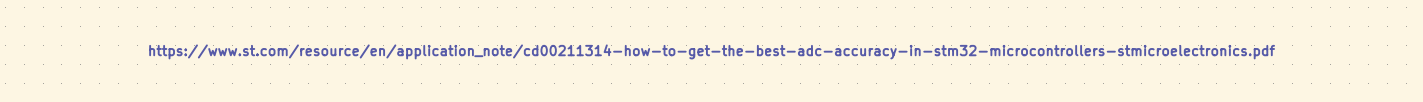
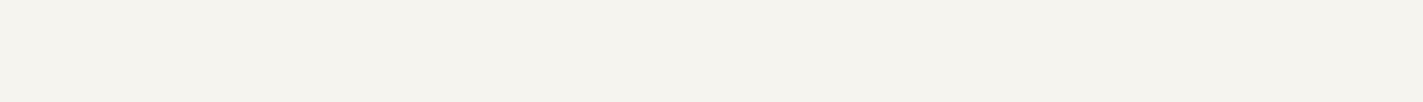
text: https://www.st.com/resource/en/application_note/cd00211314-how-to-get-the-best-adc-accuracy-in-stm32-microcontrollers-stmicroelectronics.pdf (712, 51) -> none

